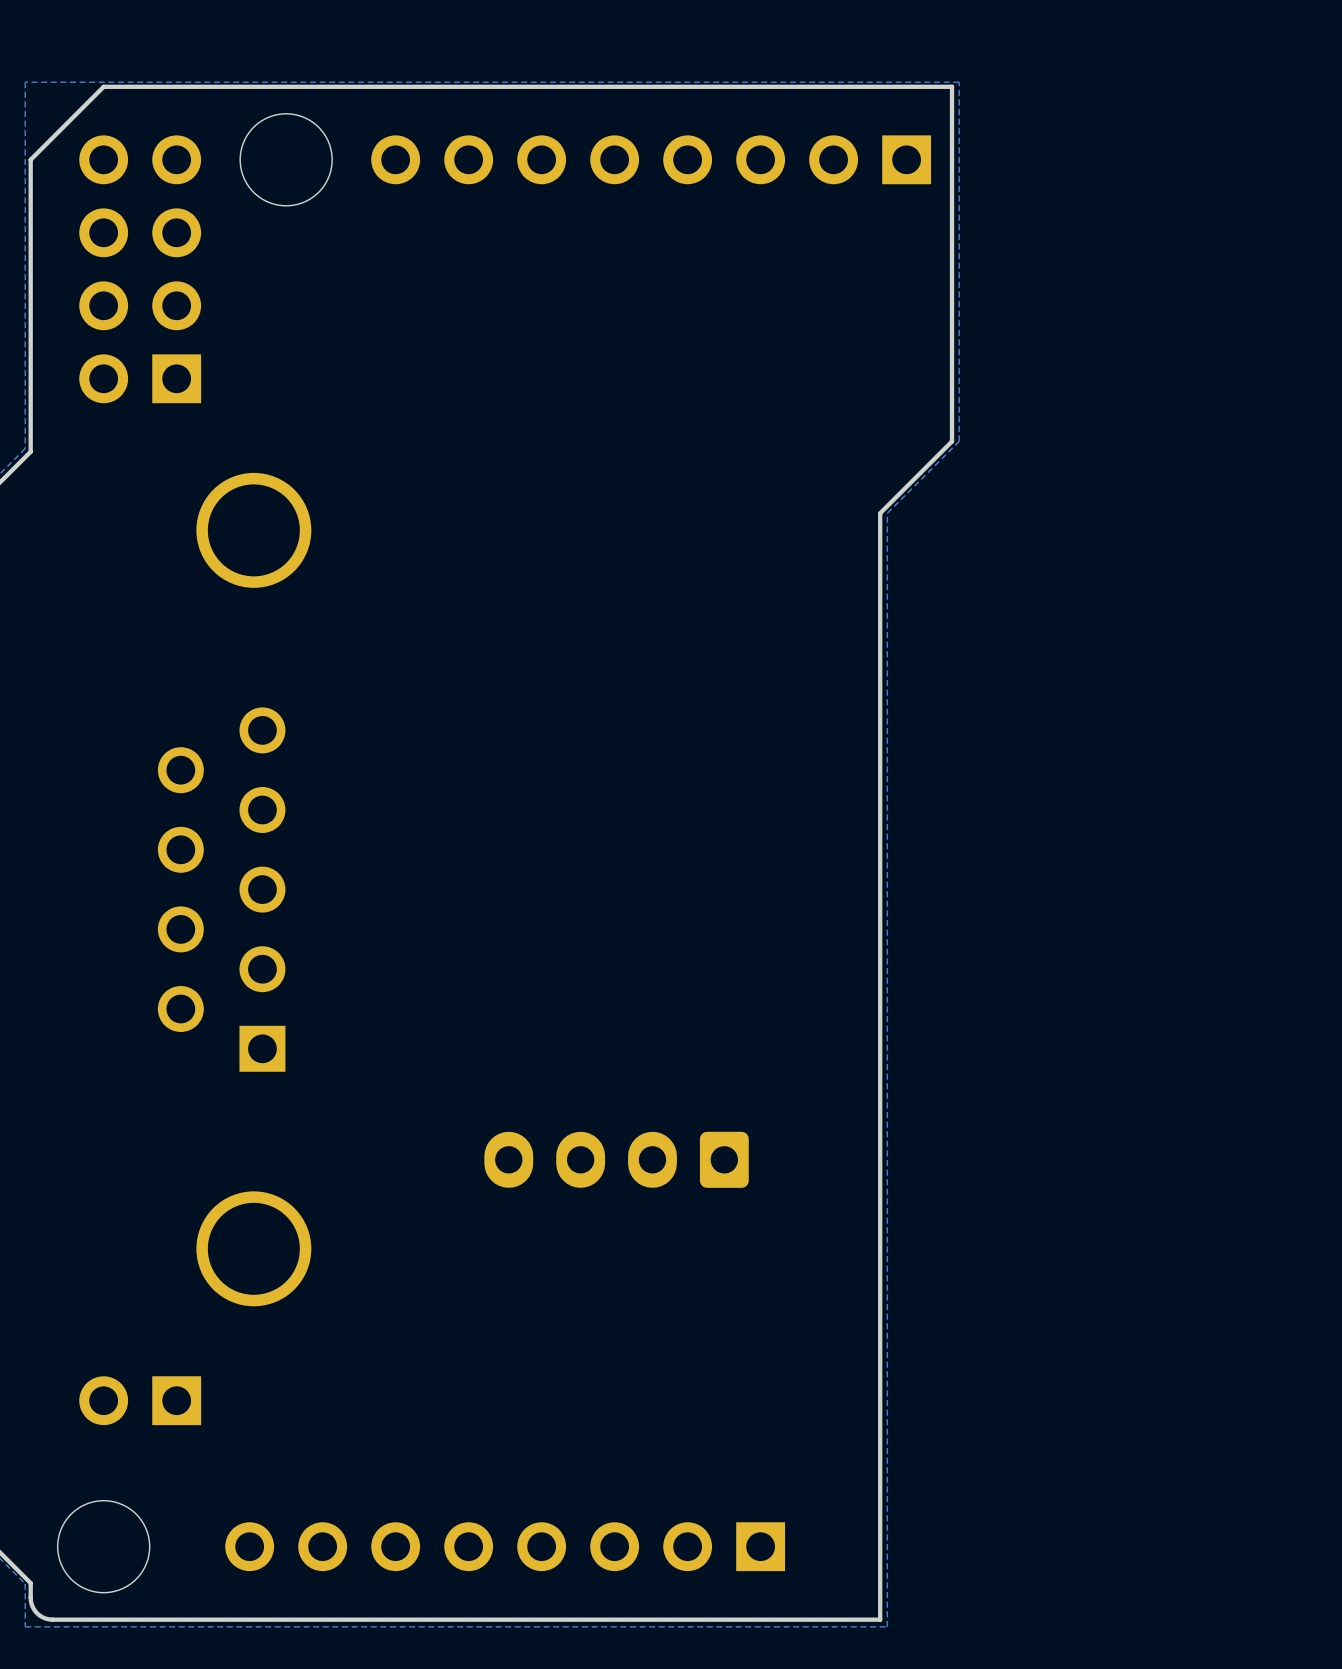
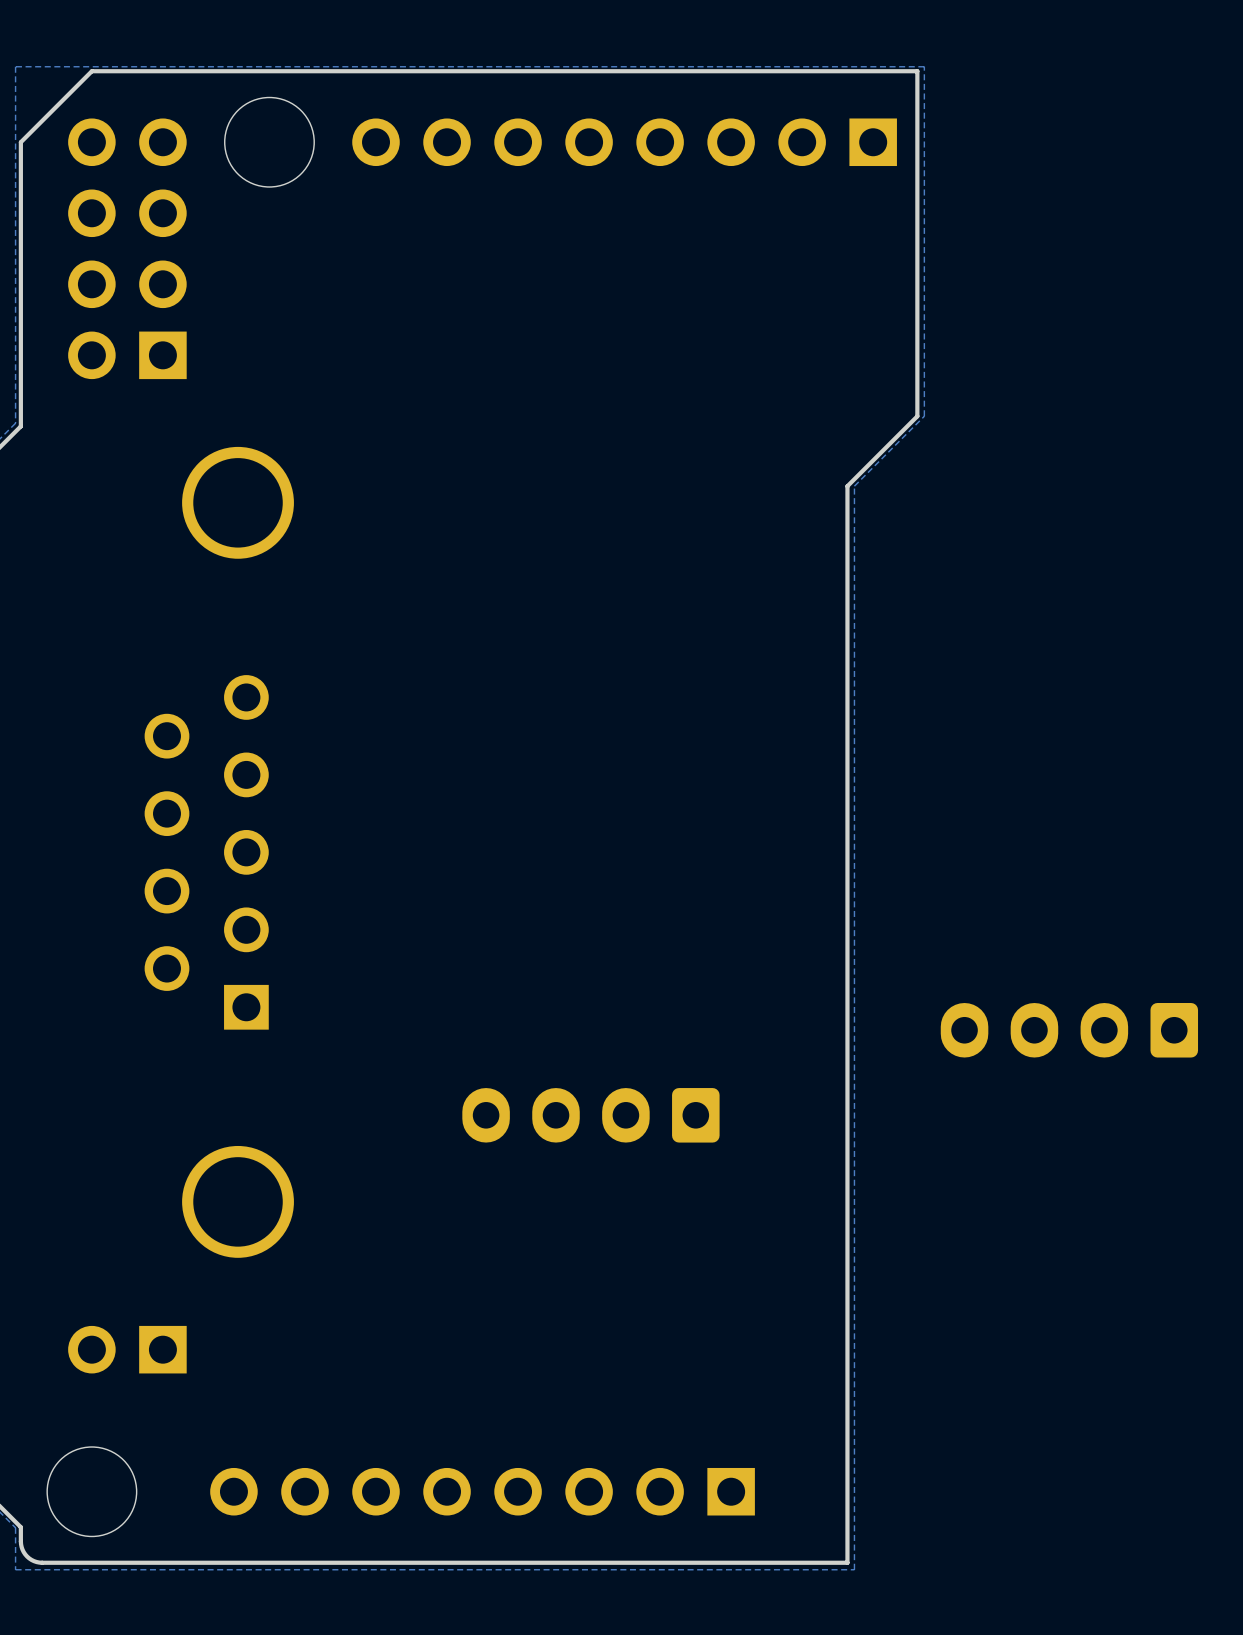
part: none -> (1069, 1030)

